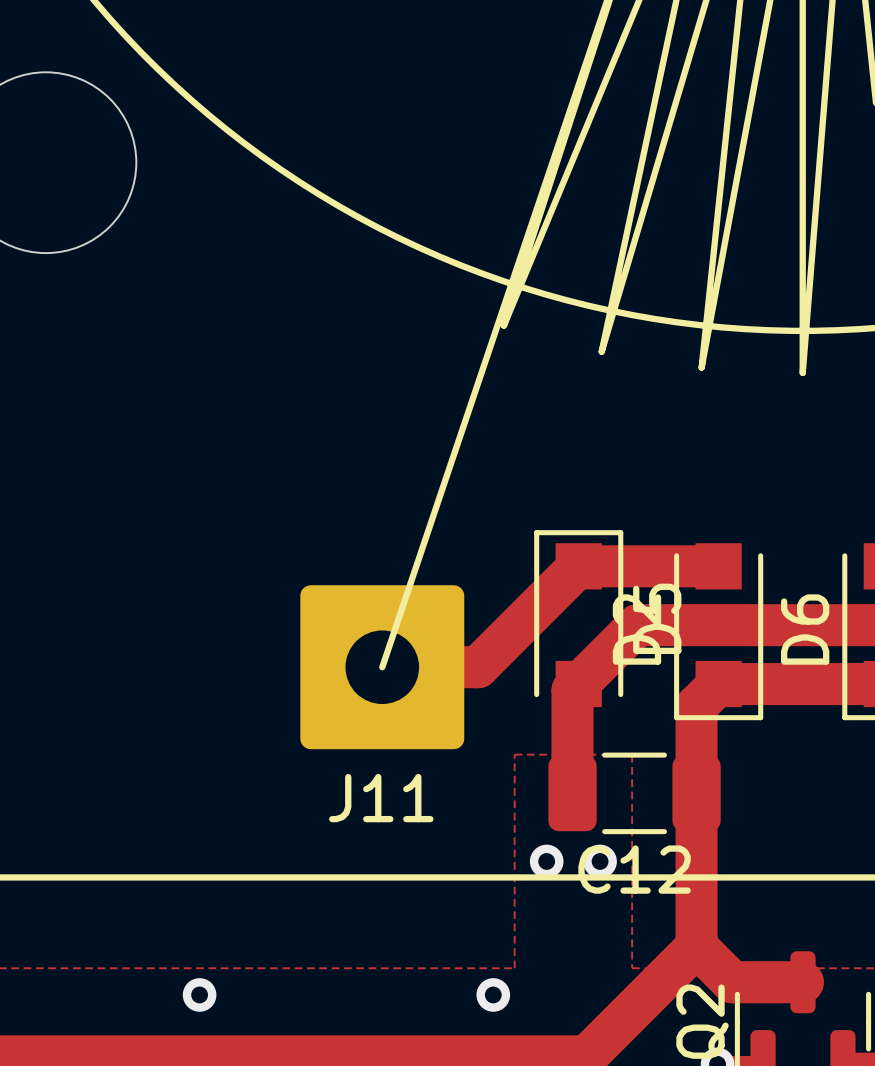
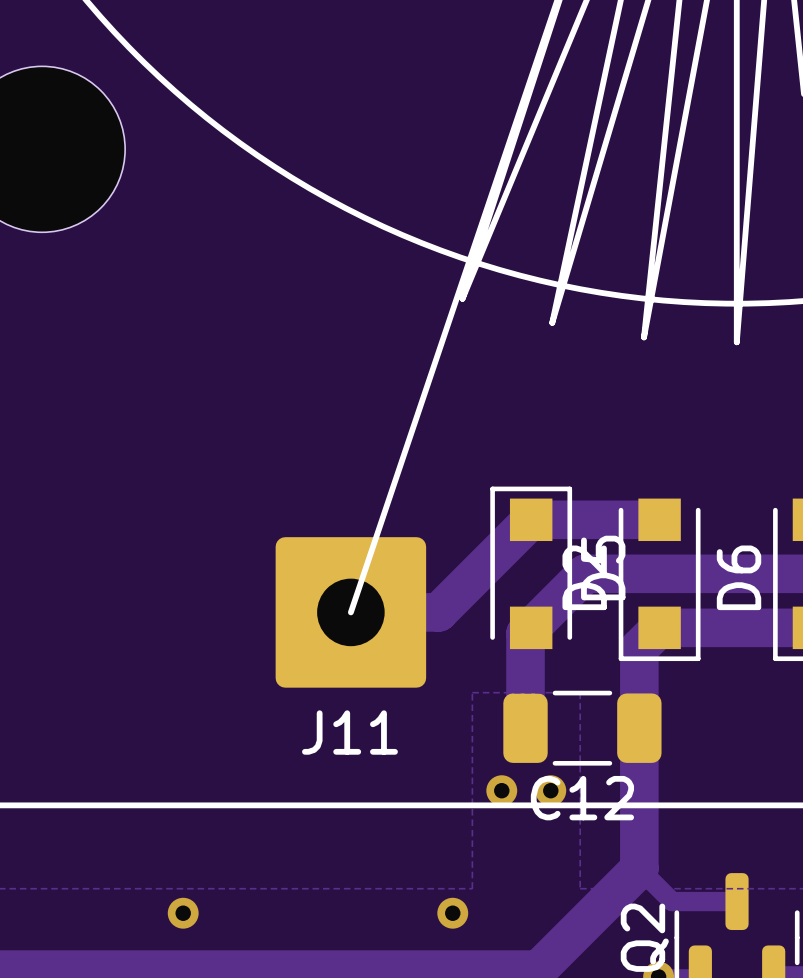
track width: thick (696, 946) (732, 982) (802, 982) -> thin (639, 868) (672, 901) (737, 901)

